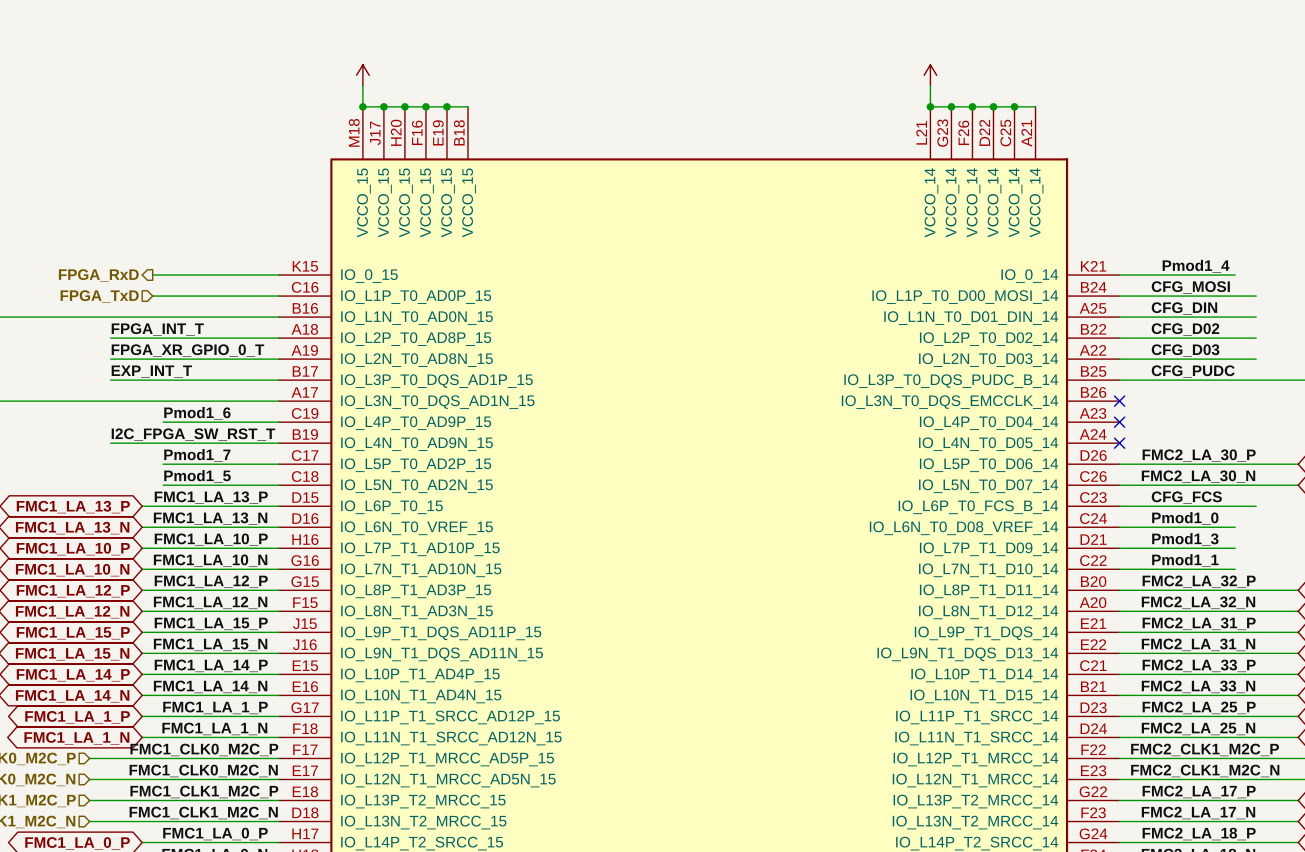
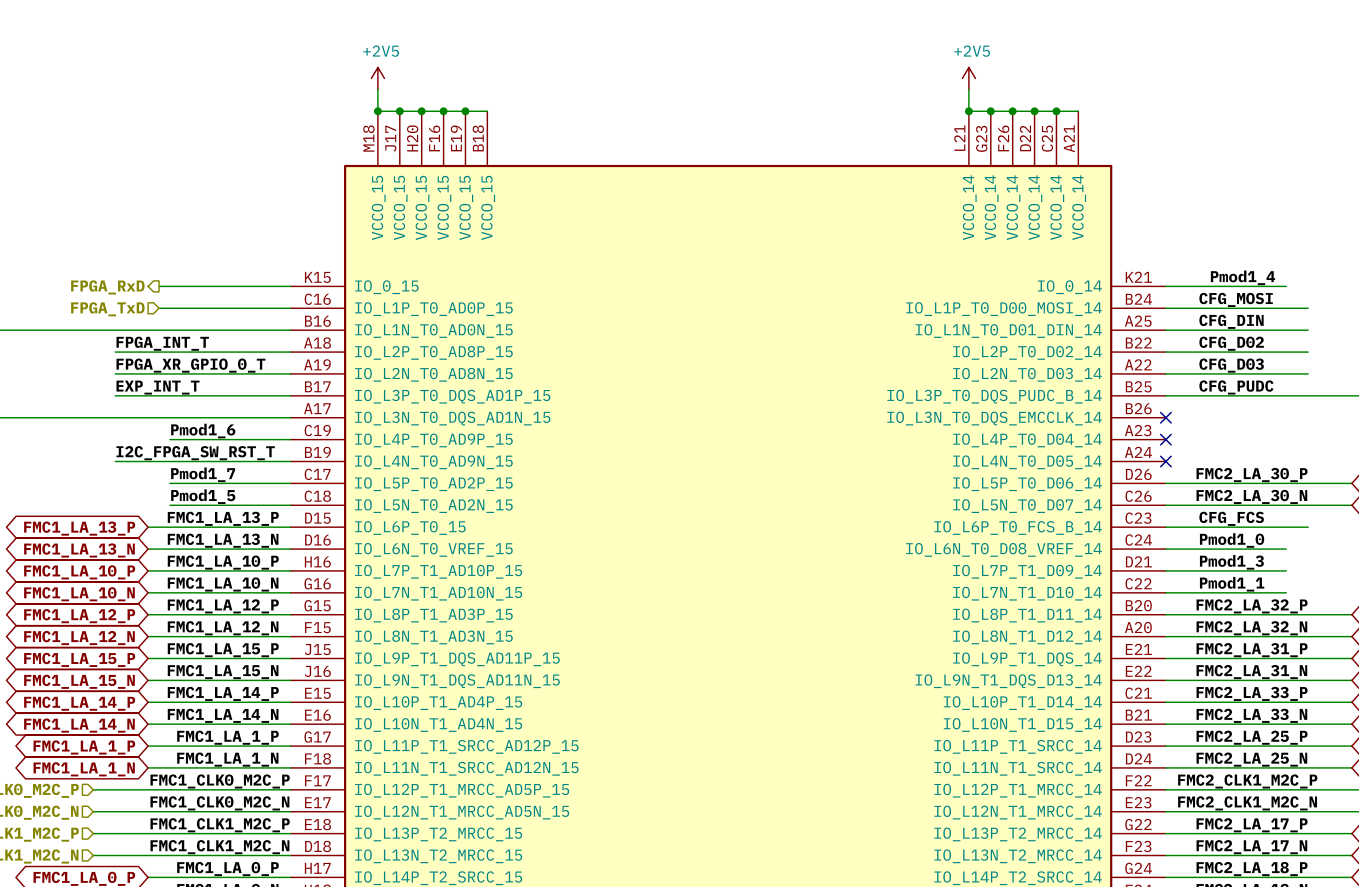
power symbol text: none -> +2V5 (381, 51)
power symbol text: none -> +2V5 (972, 51)

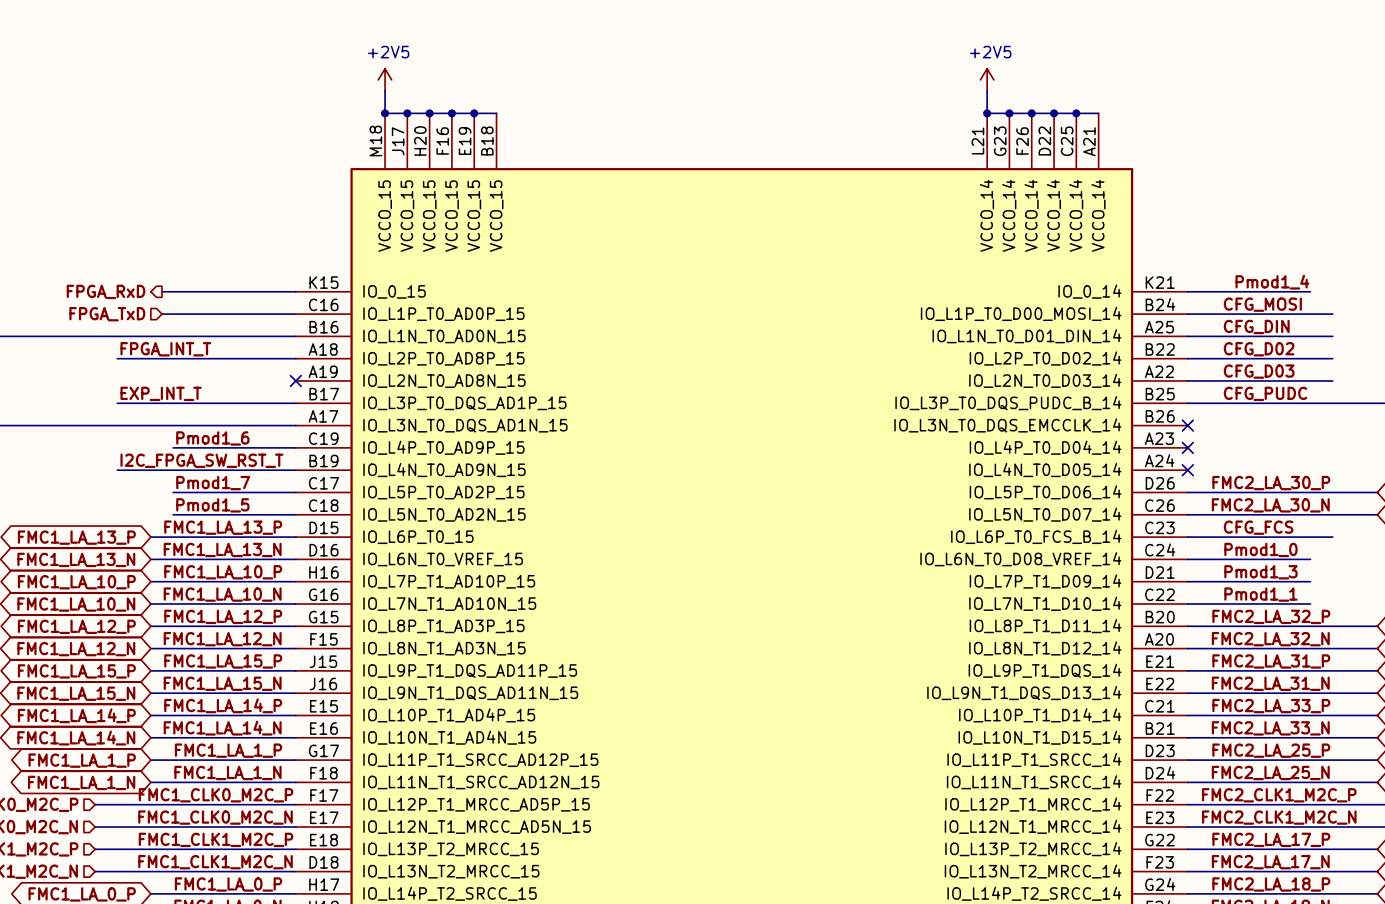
label: FPGA_XR_GPIO_0_T (190, 365) -> none
wire: (115, 373) (290, 373) -> none
no-connect mark: none -> (295, 380)

